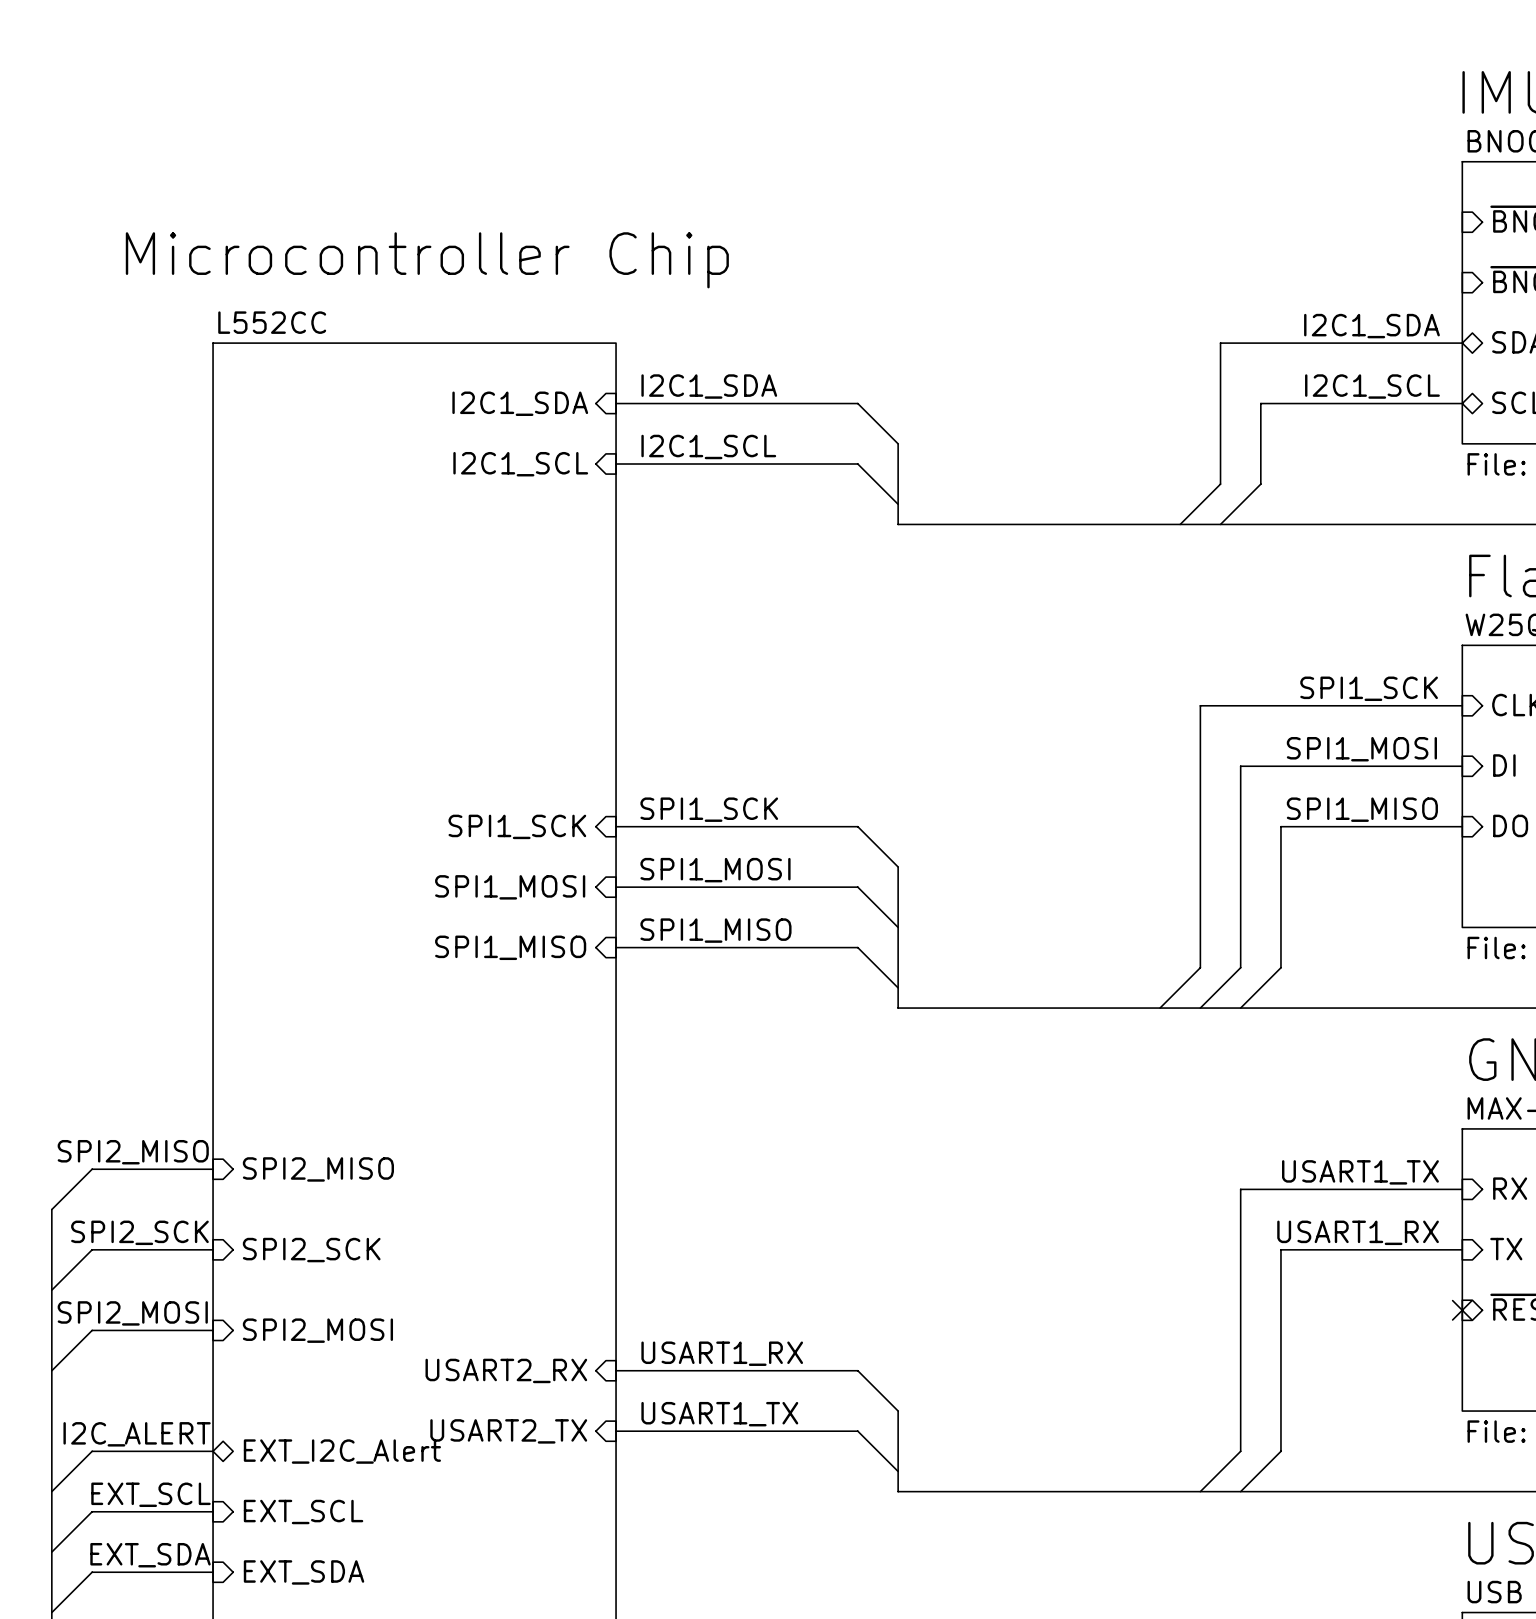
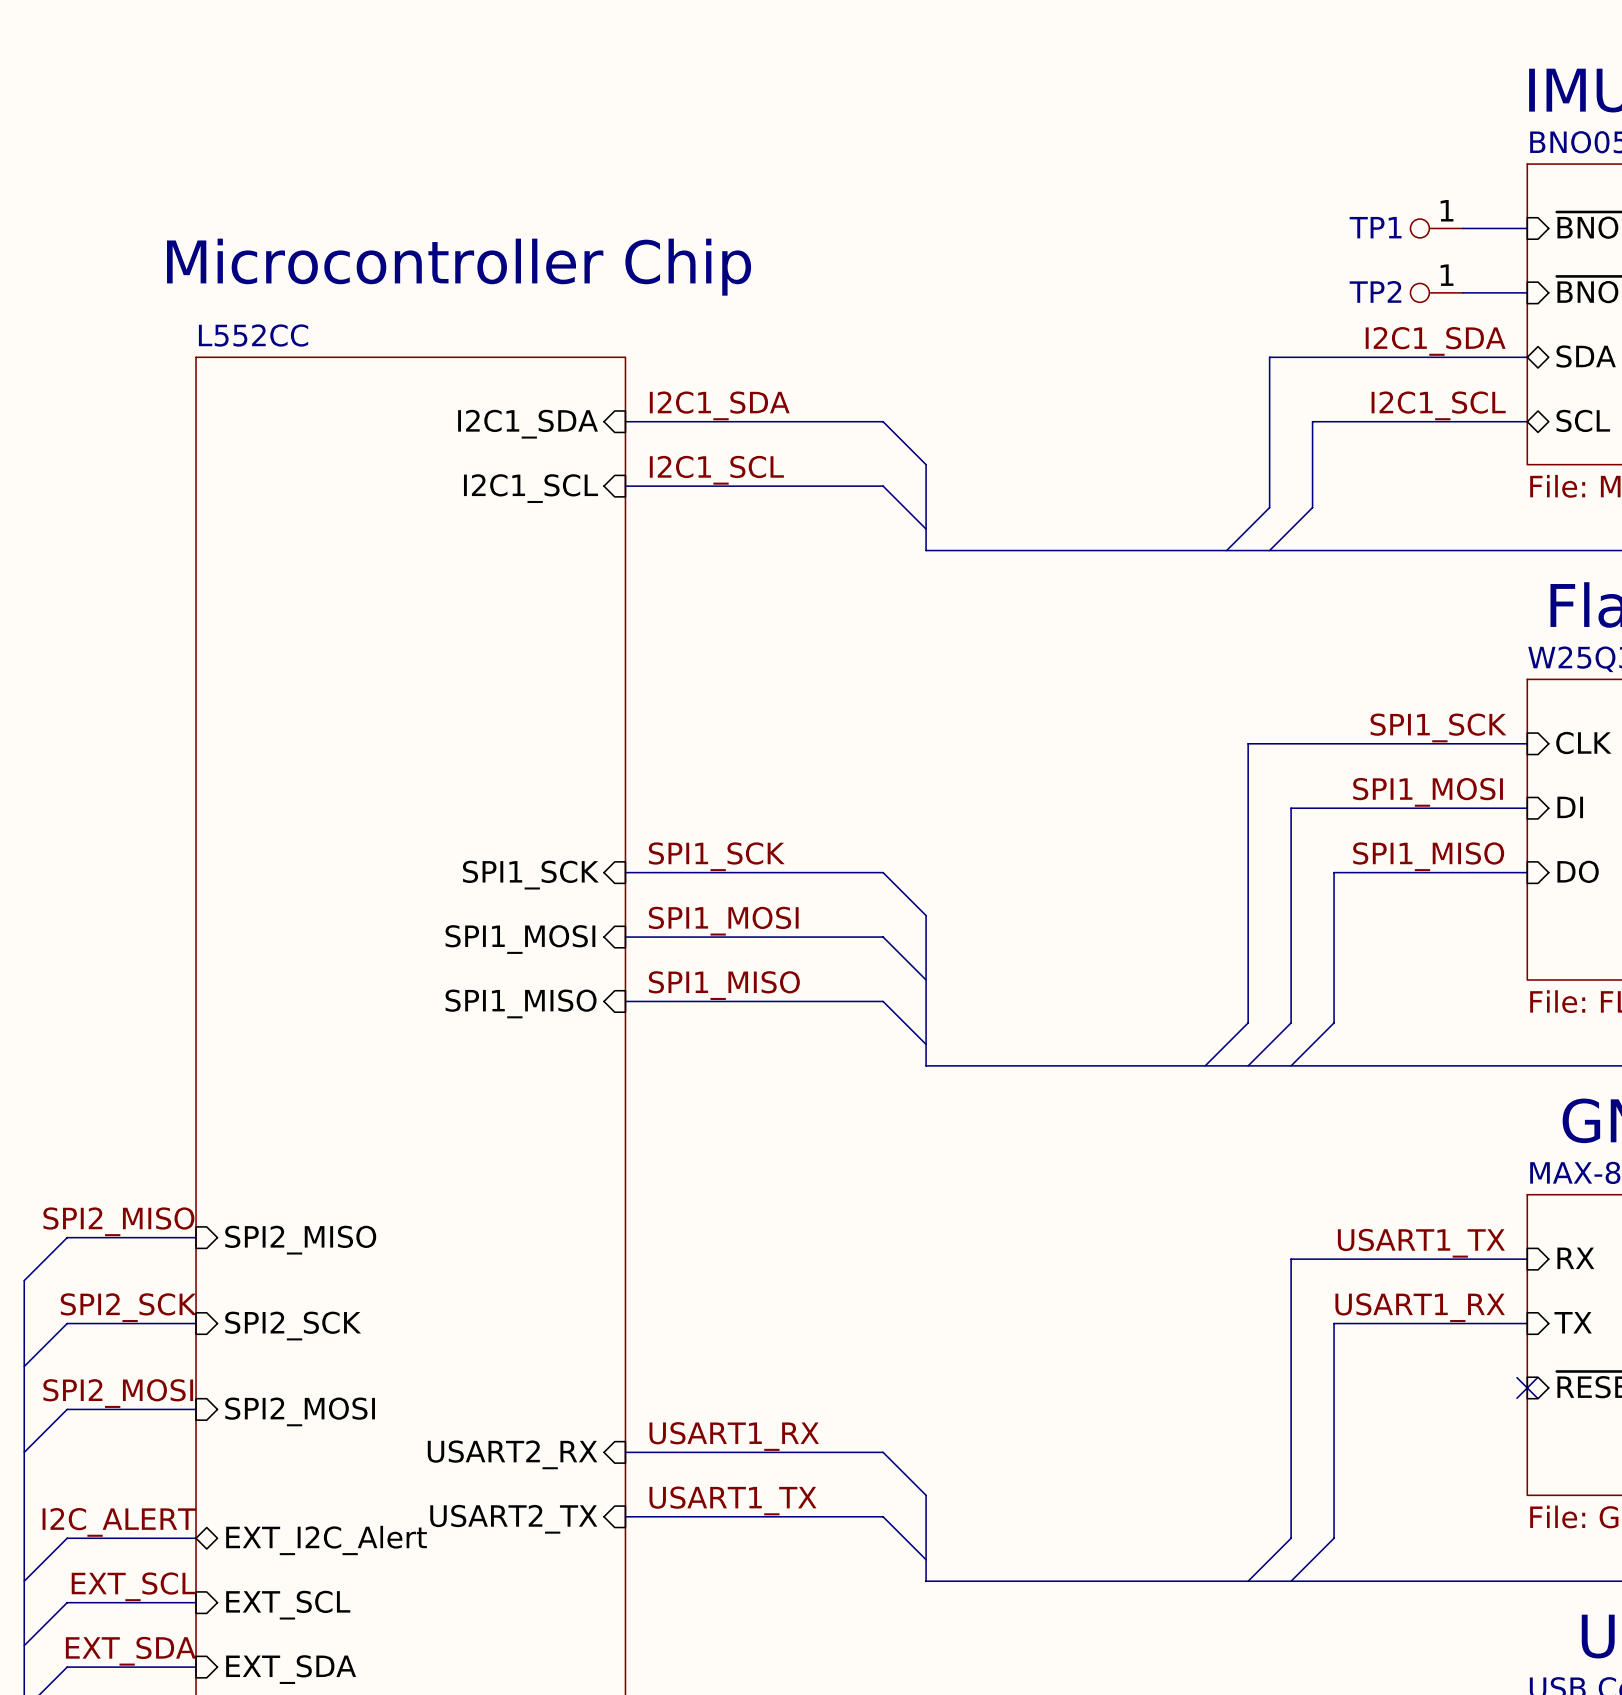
TP1: none -> (1436, 228)
wire: none -> (1462, 228) (1527, 228)
TP2: none -> (1436, 292)
wire: none -> (1462, 292) (1527, 292)

